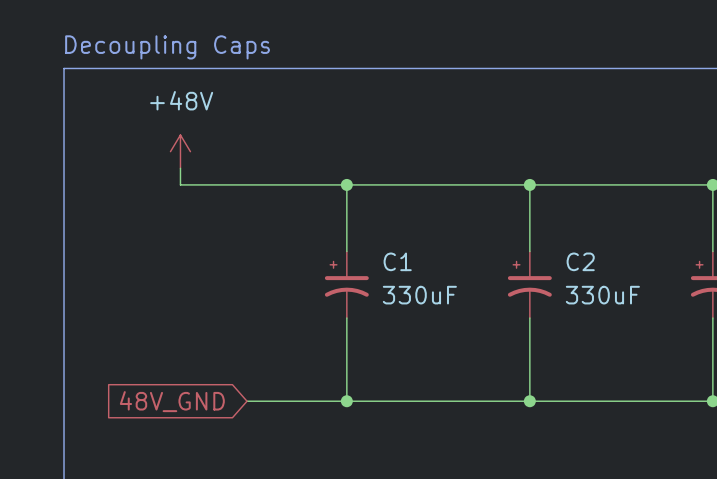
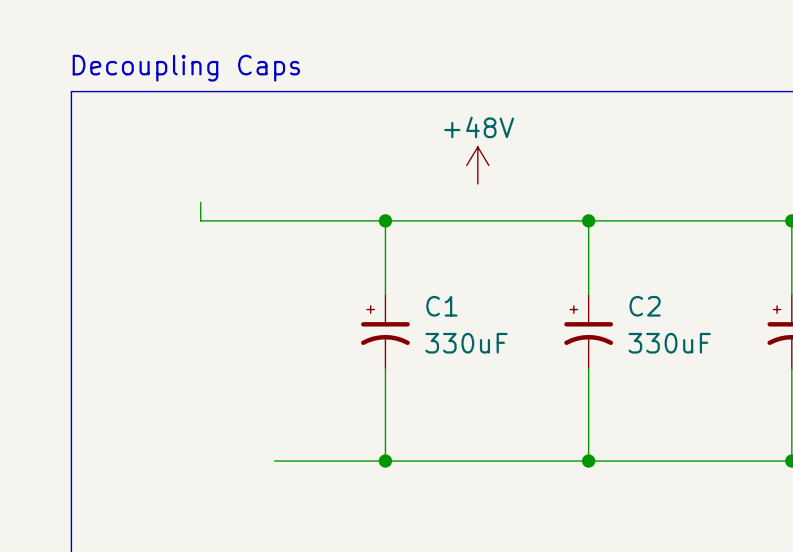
power symbol text position: +48V (181, 100) -> +48V (479, 127)
power symbol position: +48V (180, 151) -> +48V (477, 165)
global label: 48V_GND (172, 401) -> none

